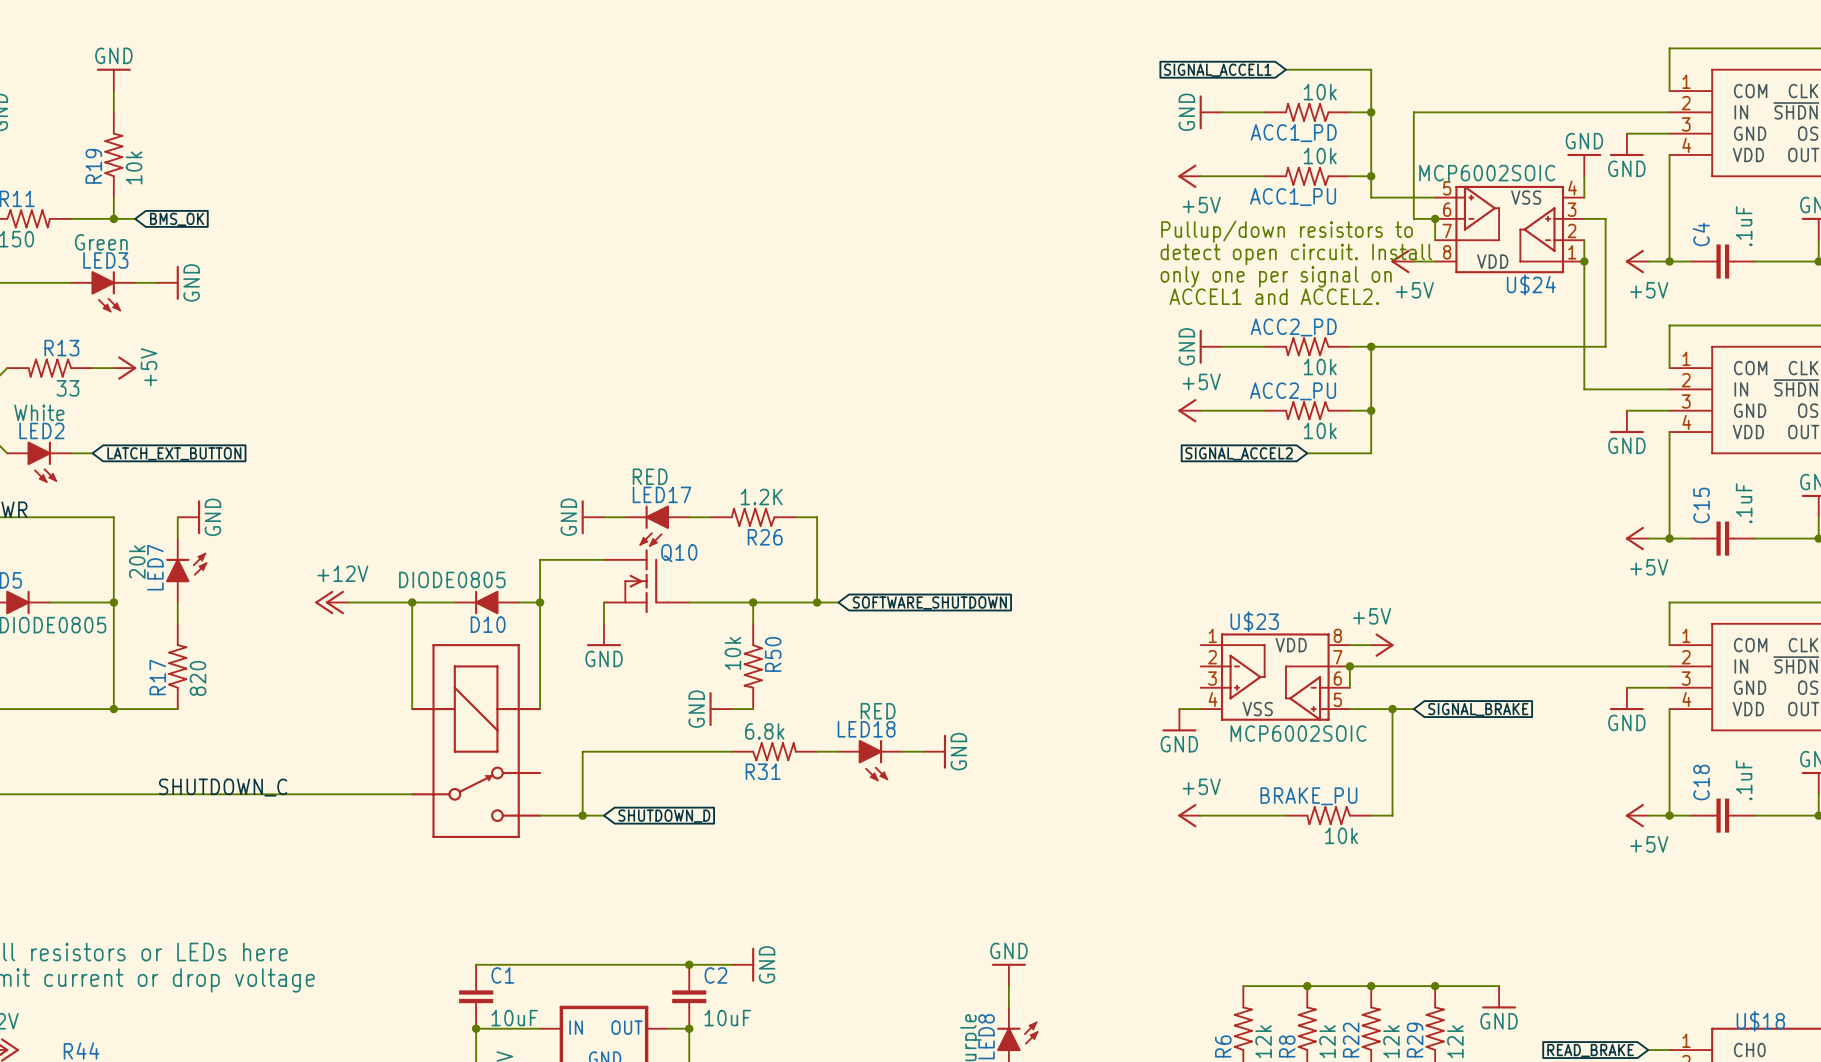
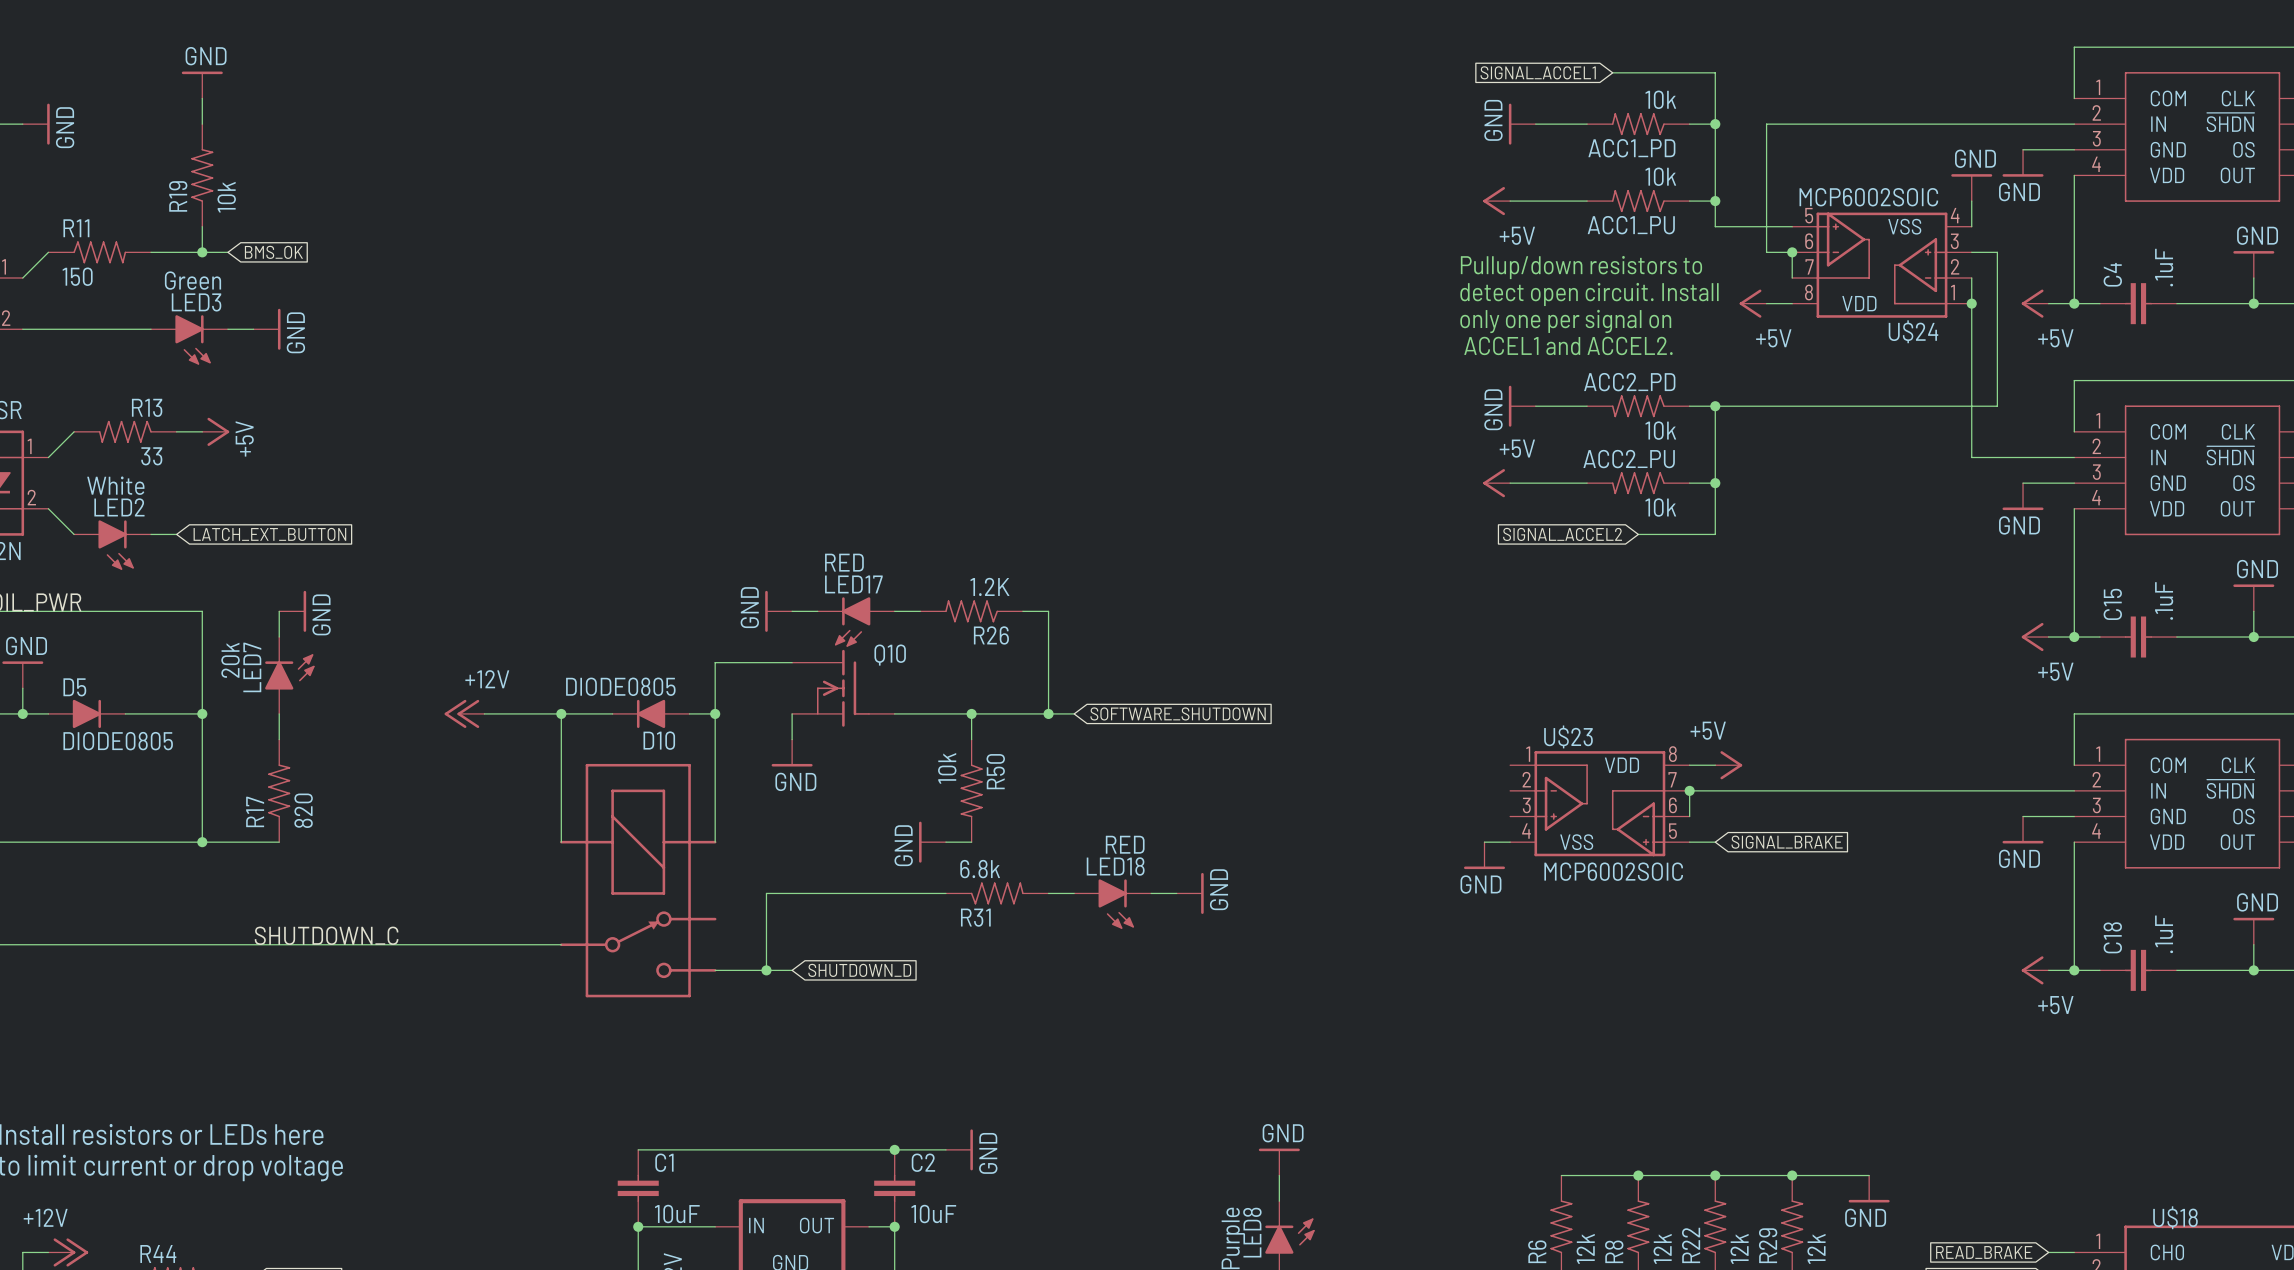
wire: (1371, 709) (1413, 709) -> none
wire: (1392, 709) (1392, 815) (1371, 815) -> none
junction: (1392, 709) -> none
global label position: SIGNAL_BRAKE (1478, 709) -> SIGNAL_BRAKE (1787, 842)
power symbol: +5V (1189, 815) -> none
wire: (1200, 815) (1285, 815) -> none
BRAKE_PU: 10k (1328, 815) -> none

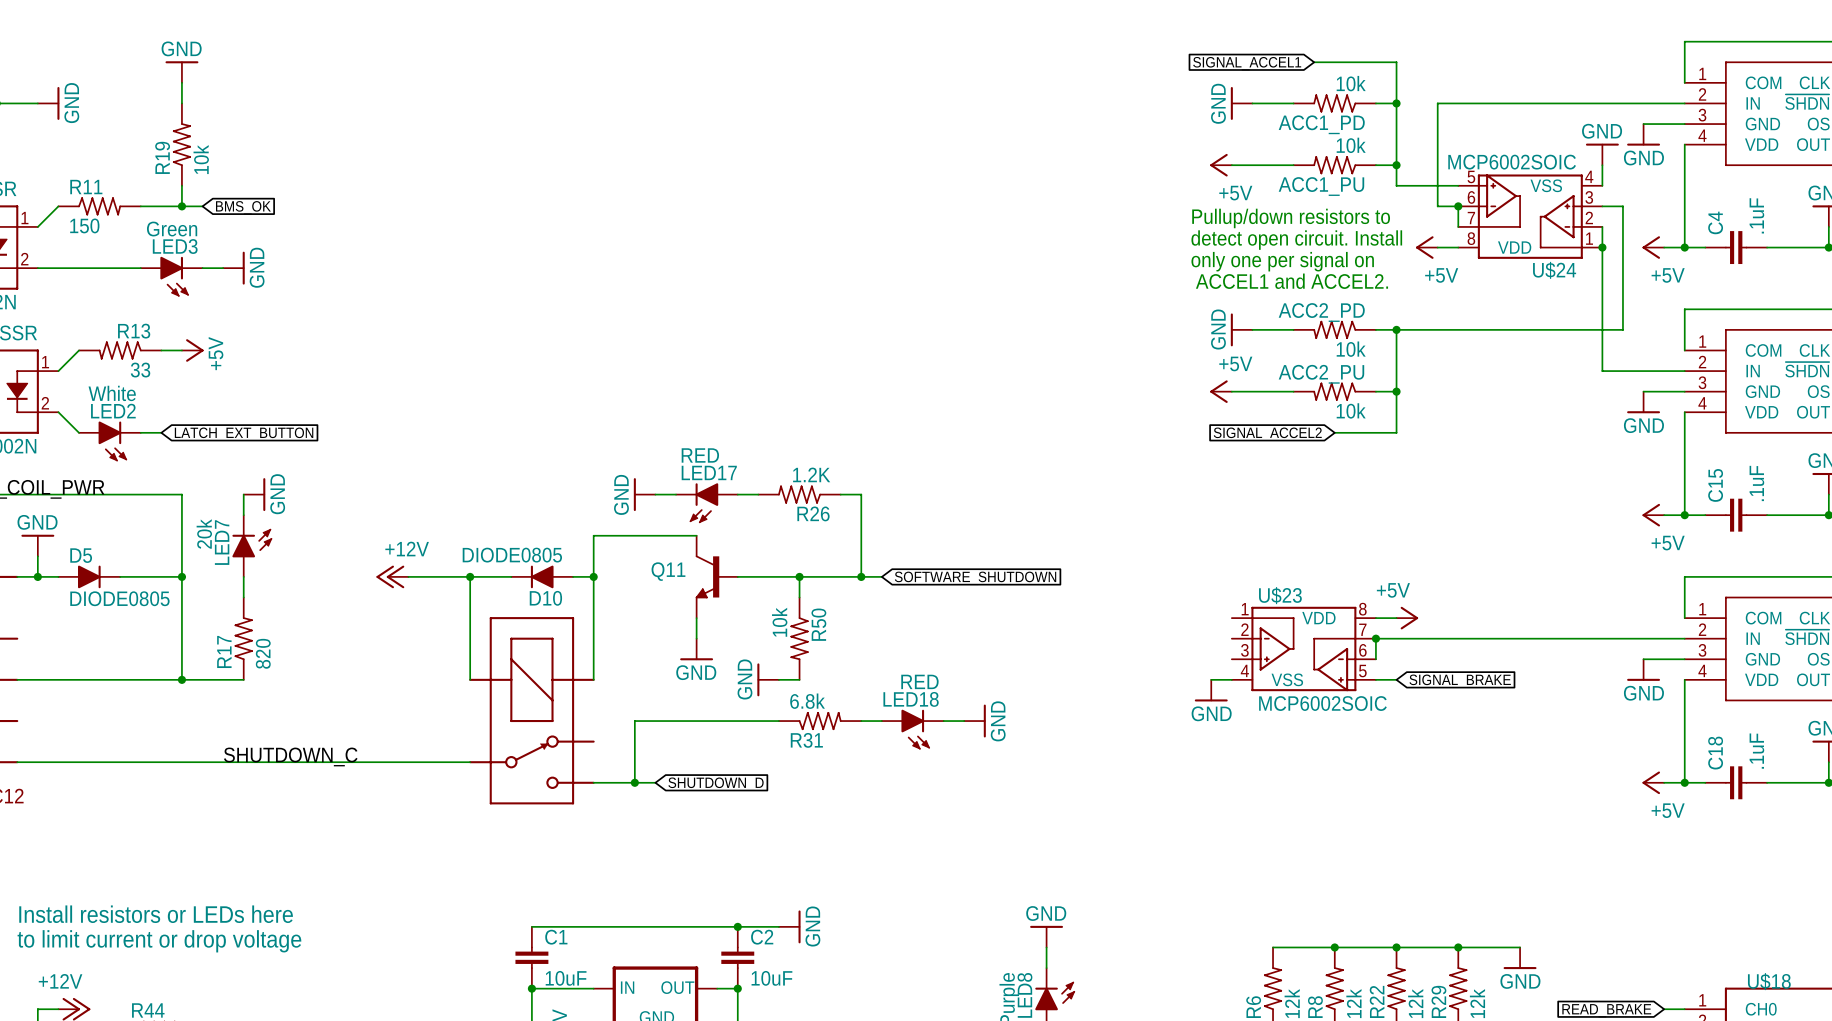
Q10: (843, 688) -> none
wire: (792, 713) (792, 739) -> (696, 618) (696, 638)
Q11: none -> (716, 576)
power symbol position: GND (792, 753) -> GND (696, 649)

